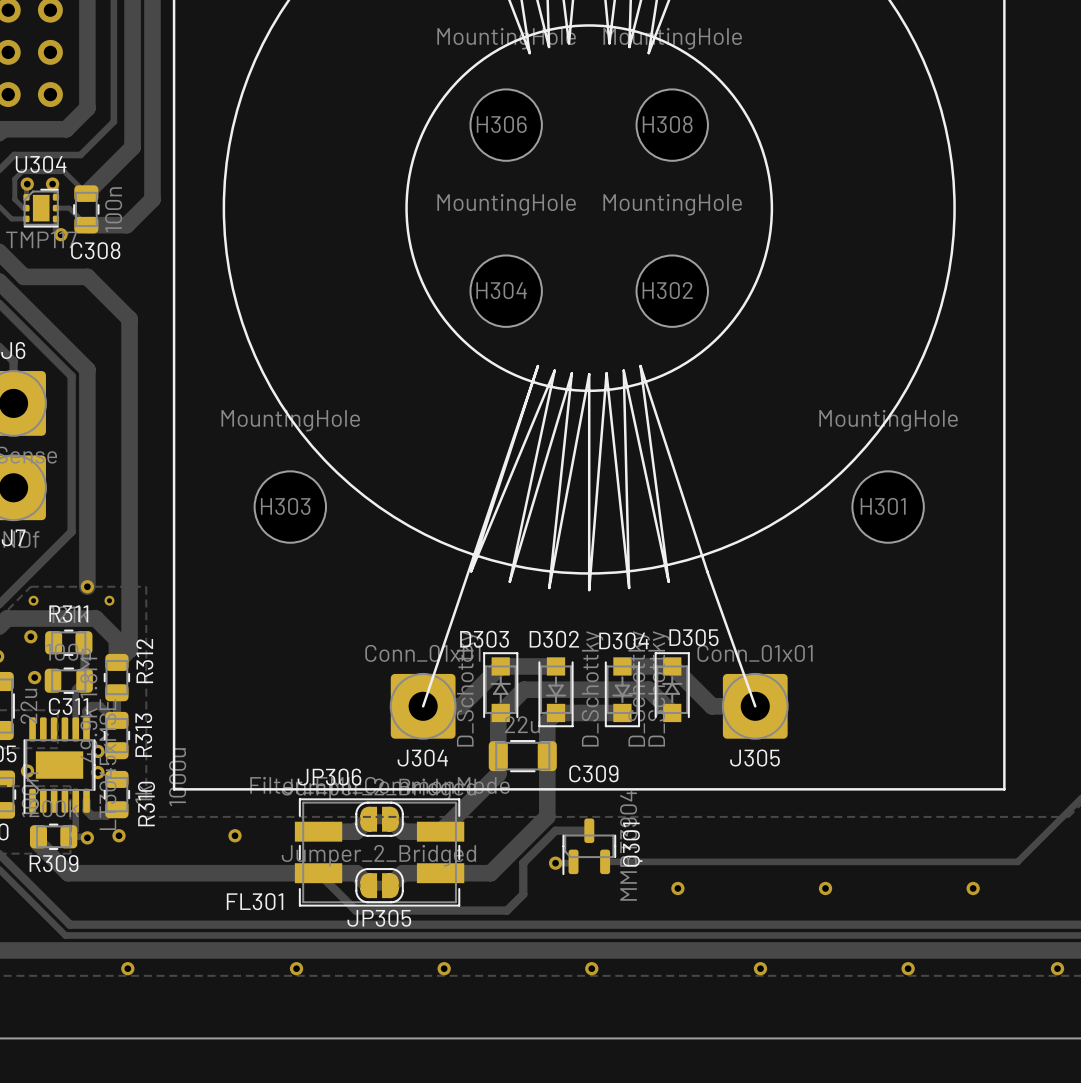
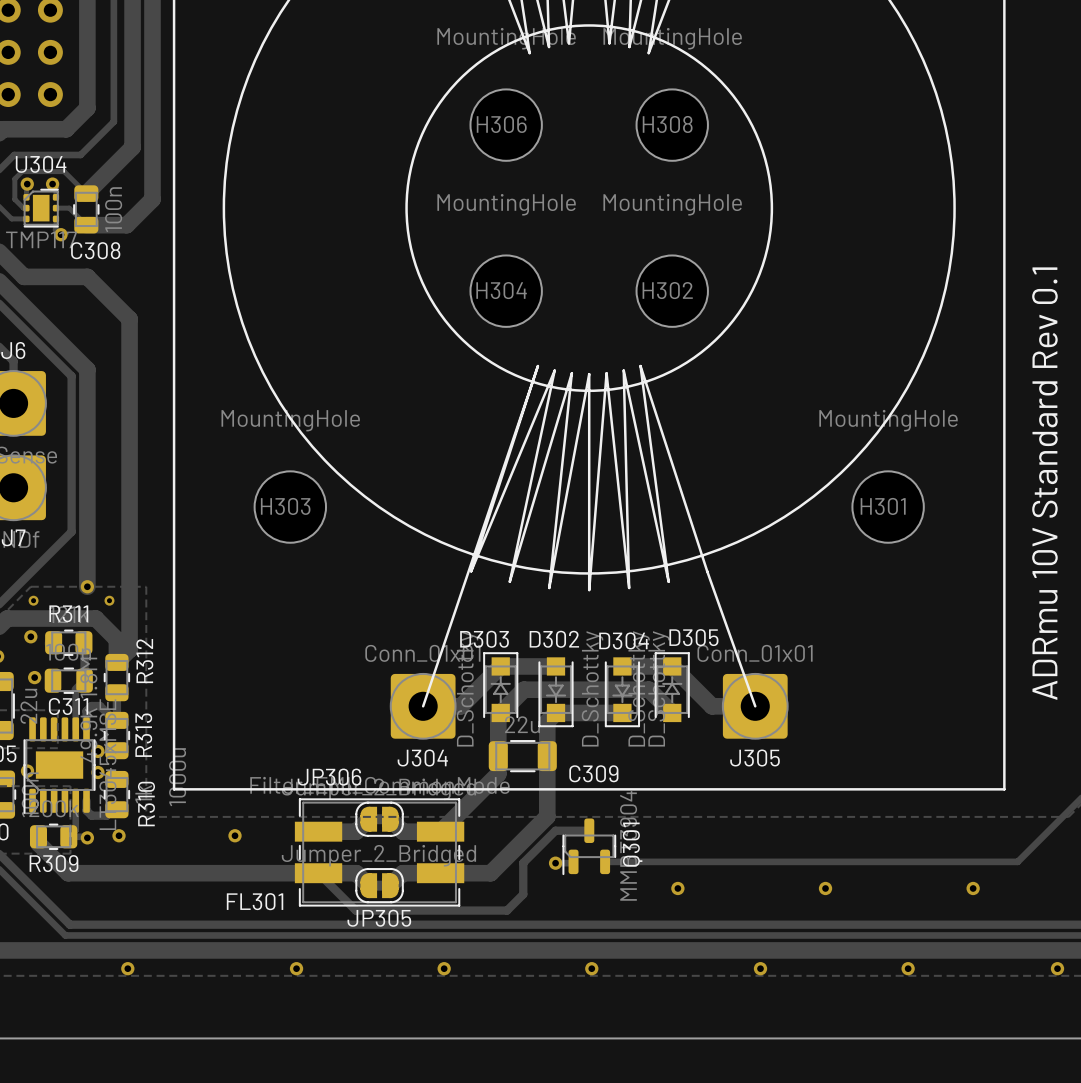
text: none -> ADRmu 10V Standard Rev 0.1 (1044, 483)

